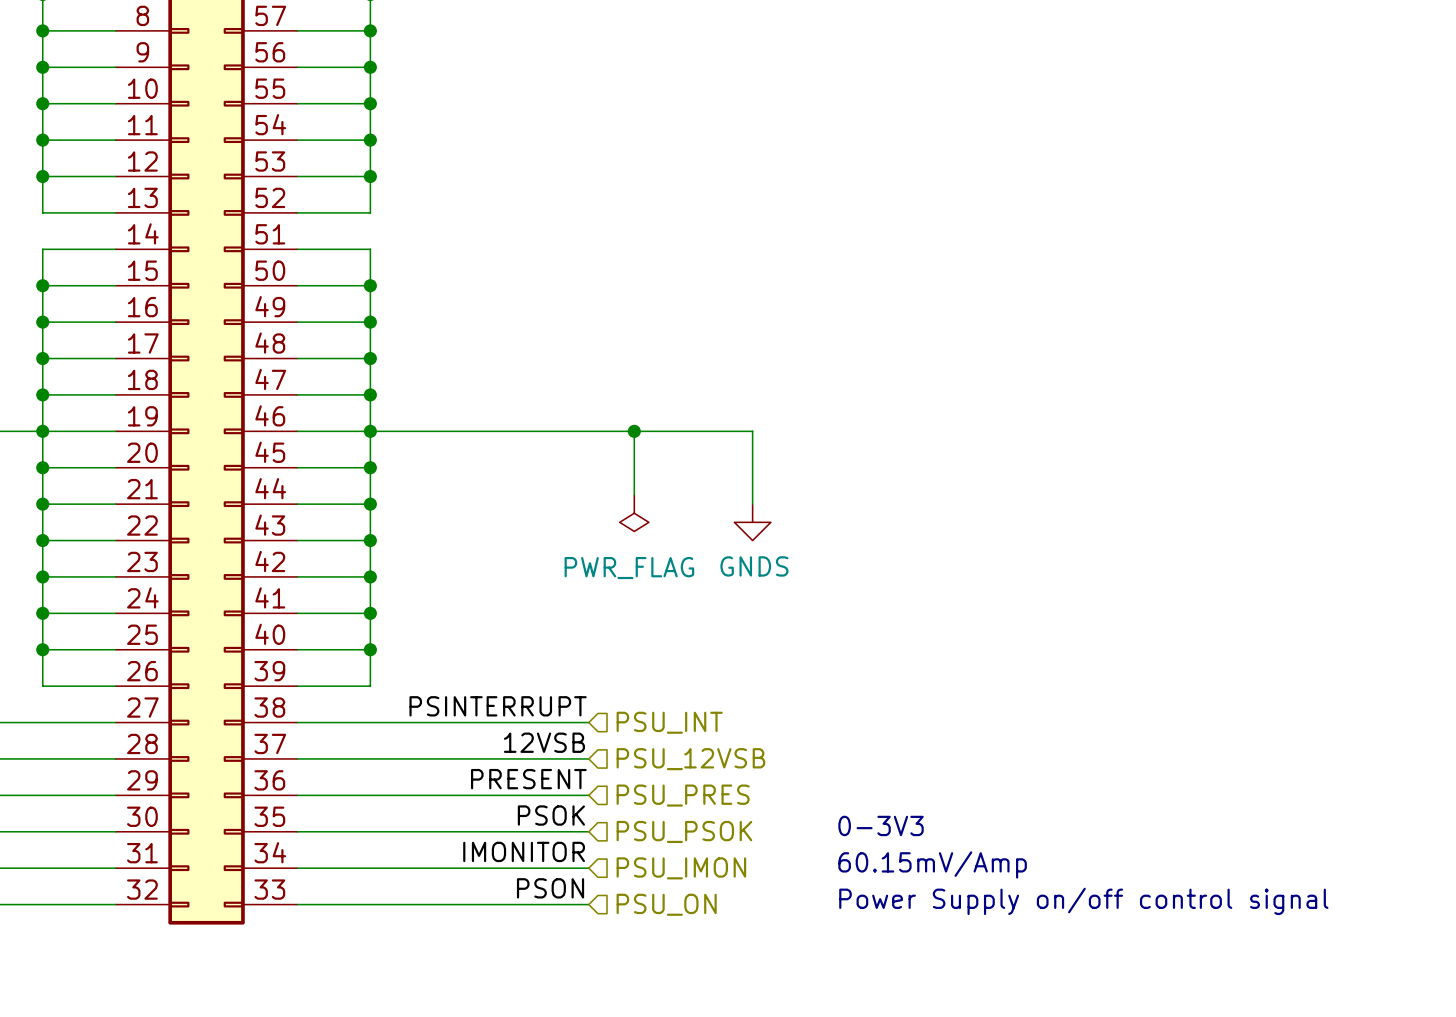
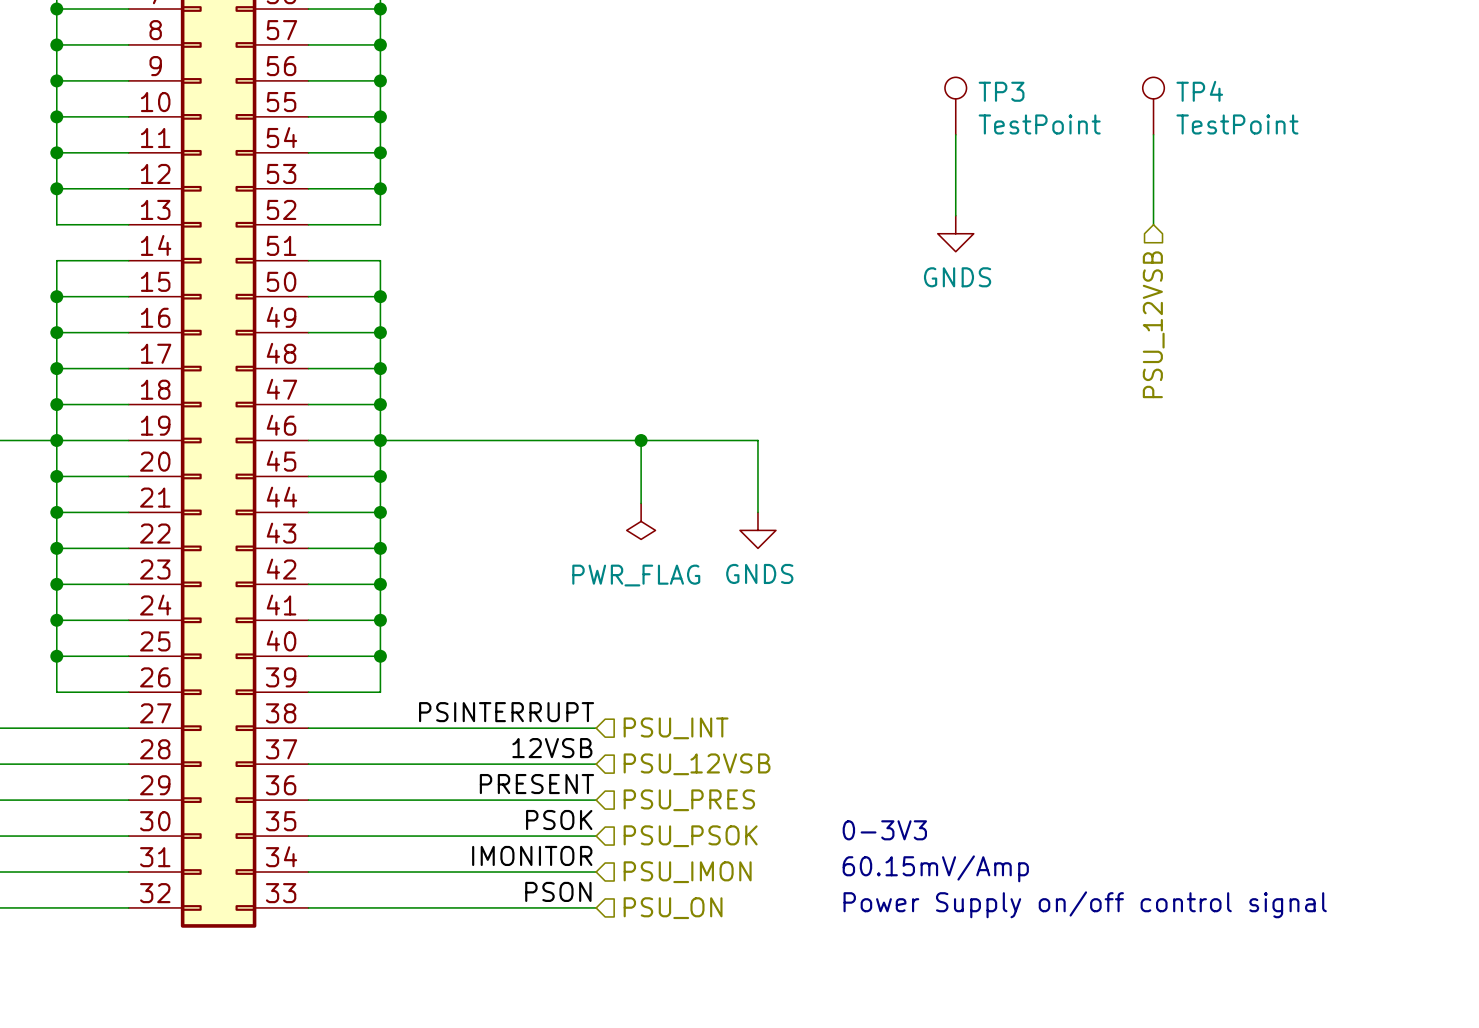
TP3: none -> TestPoint (955, 106)
TP4: none -> TestPoint (1153, 106)
wire: none -> (955, 134) (955, 215)
wire: none -> (1153, 134) (1153, 224)
power symbol: none -> GNDS (955, 233)
hierarchical label: none -> PSU_12VSB (1153, 324)

